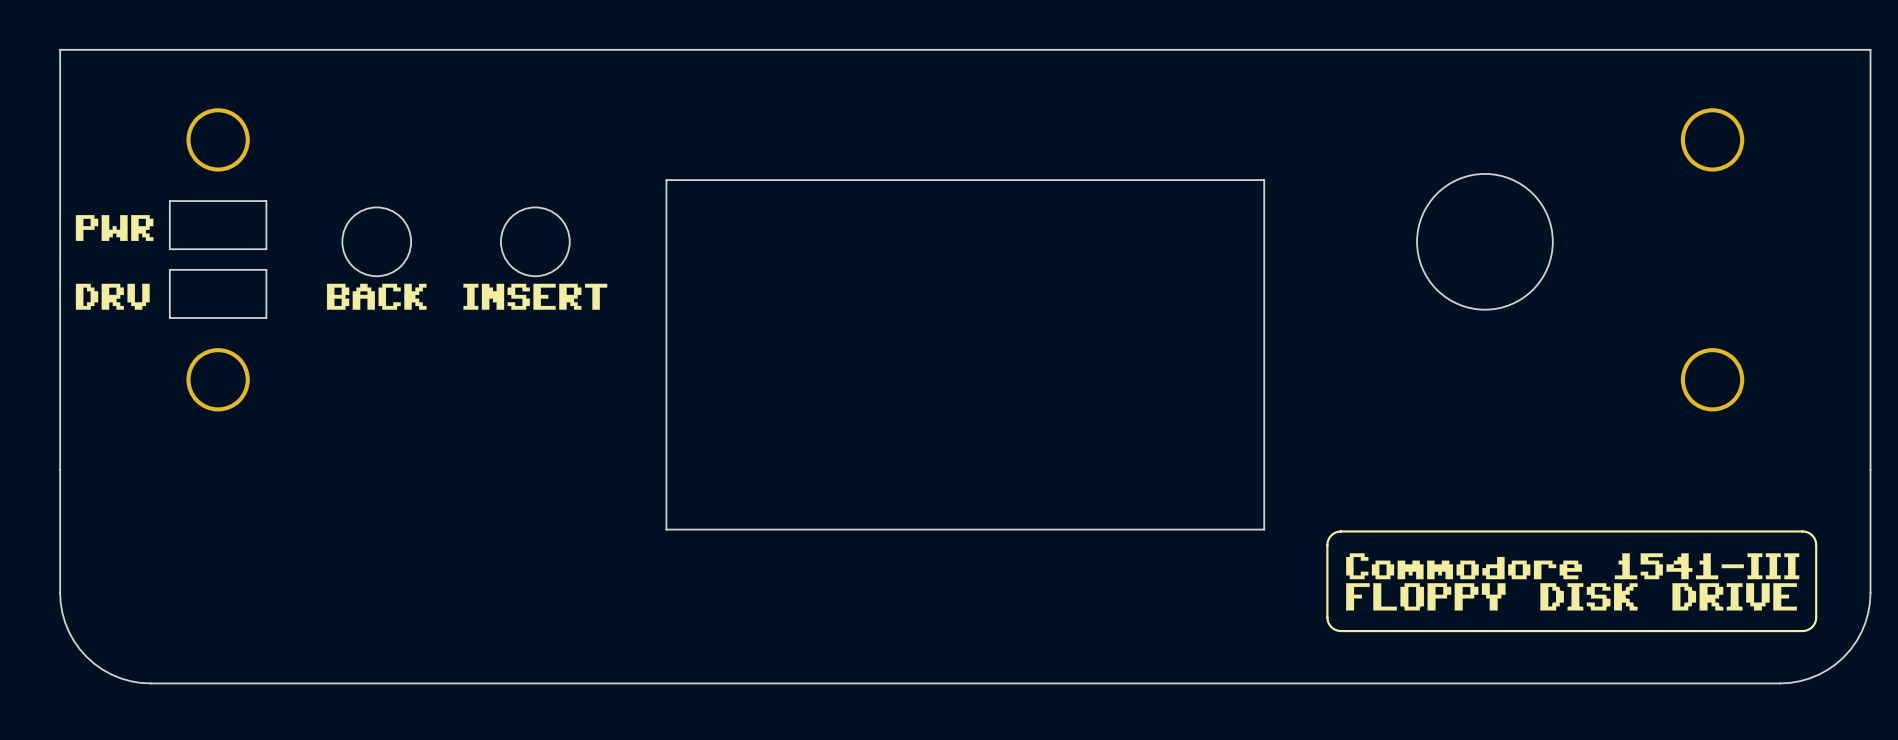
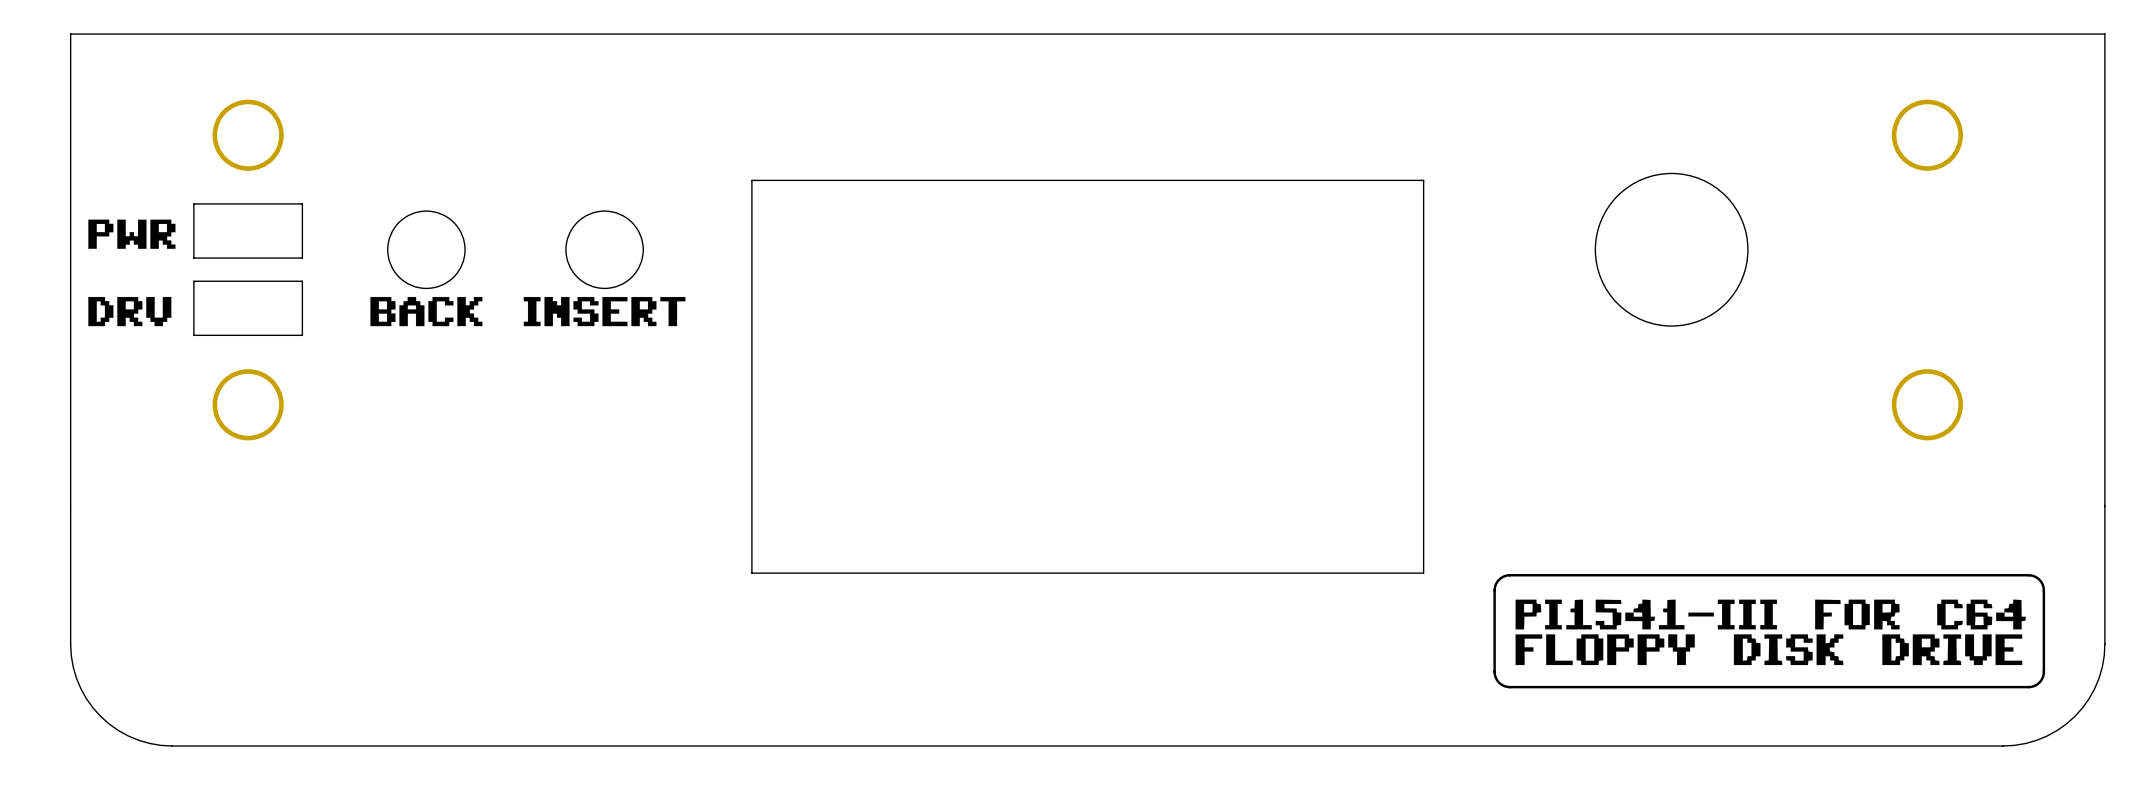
drawing shape: [1346, 553, 1800, 611] -> [1515, 599, 2026, 666]

